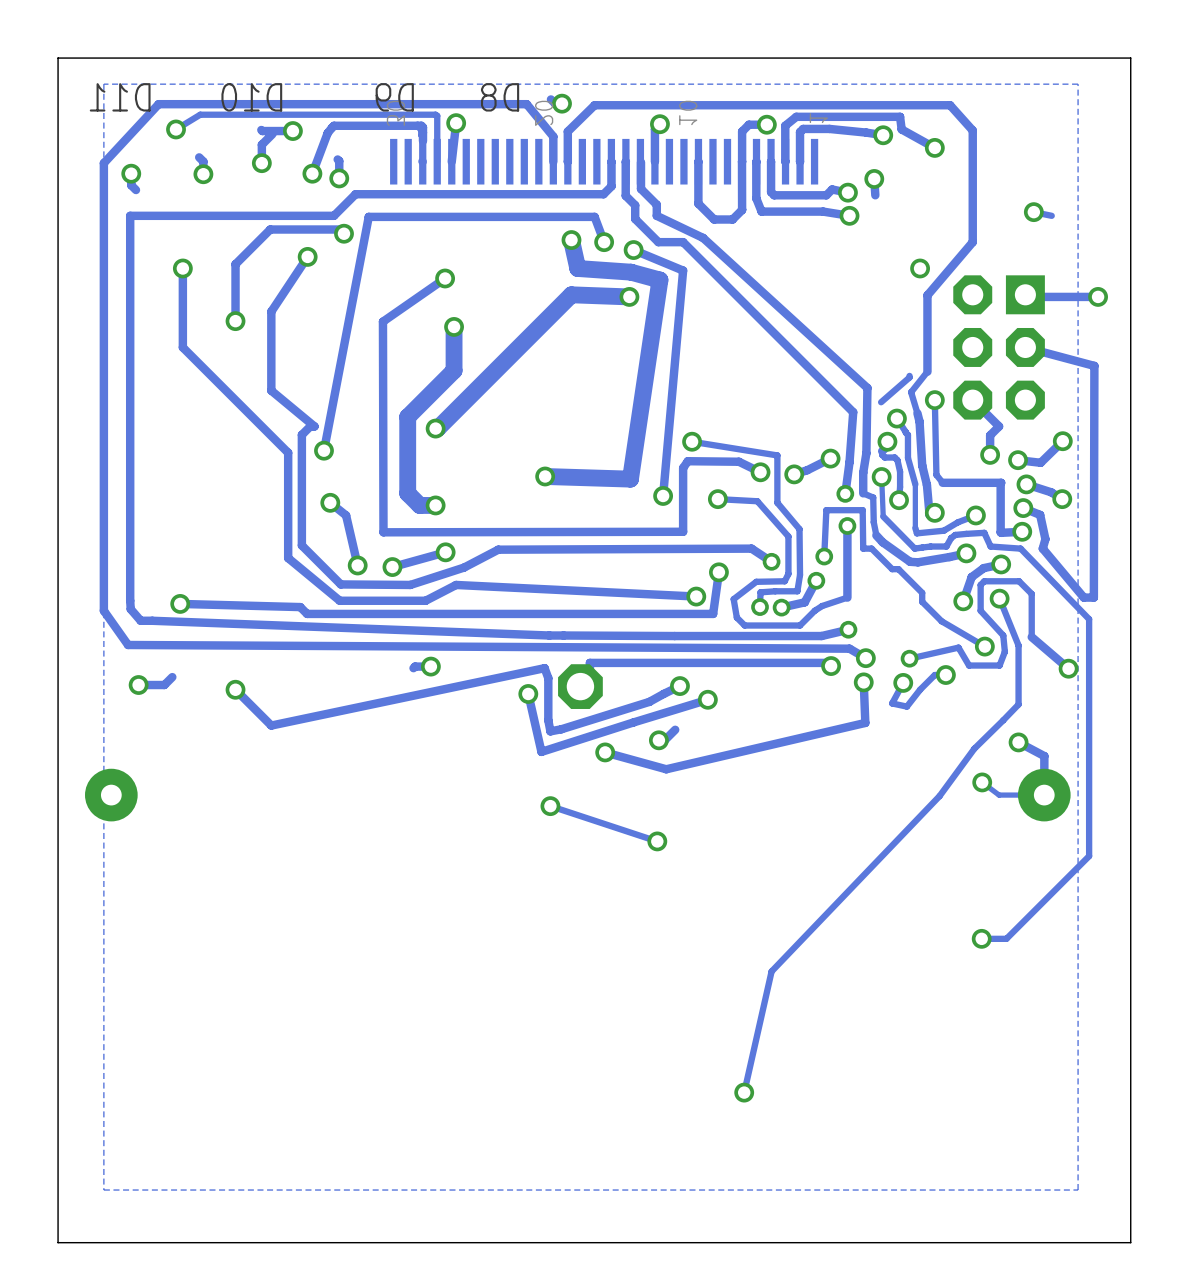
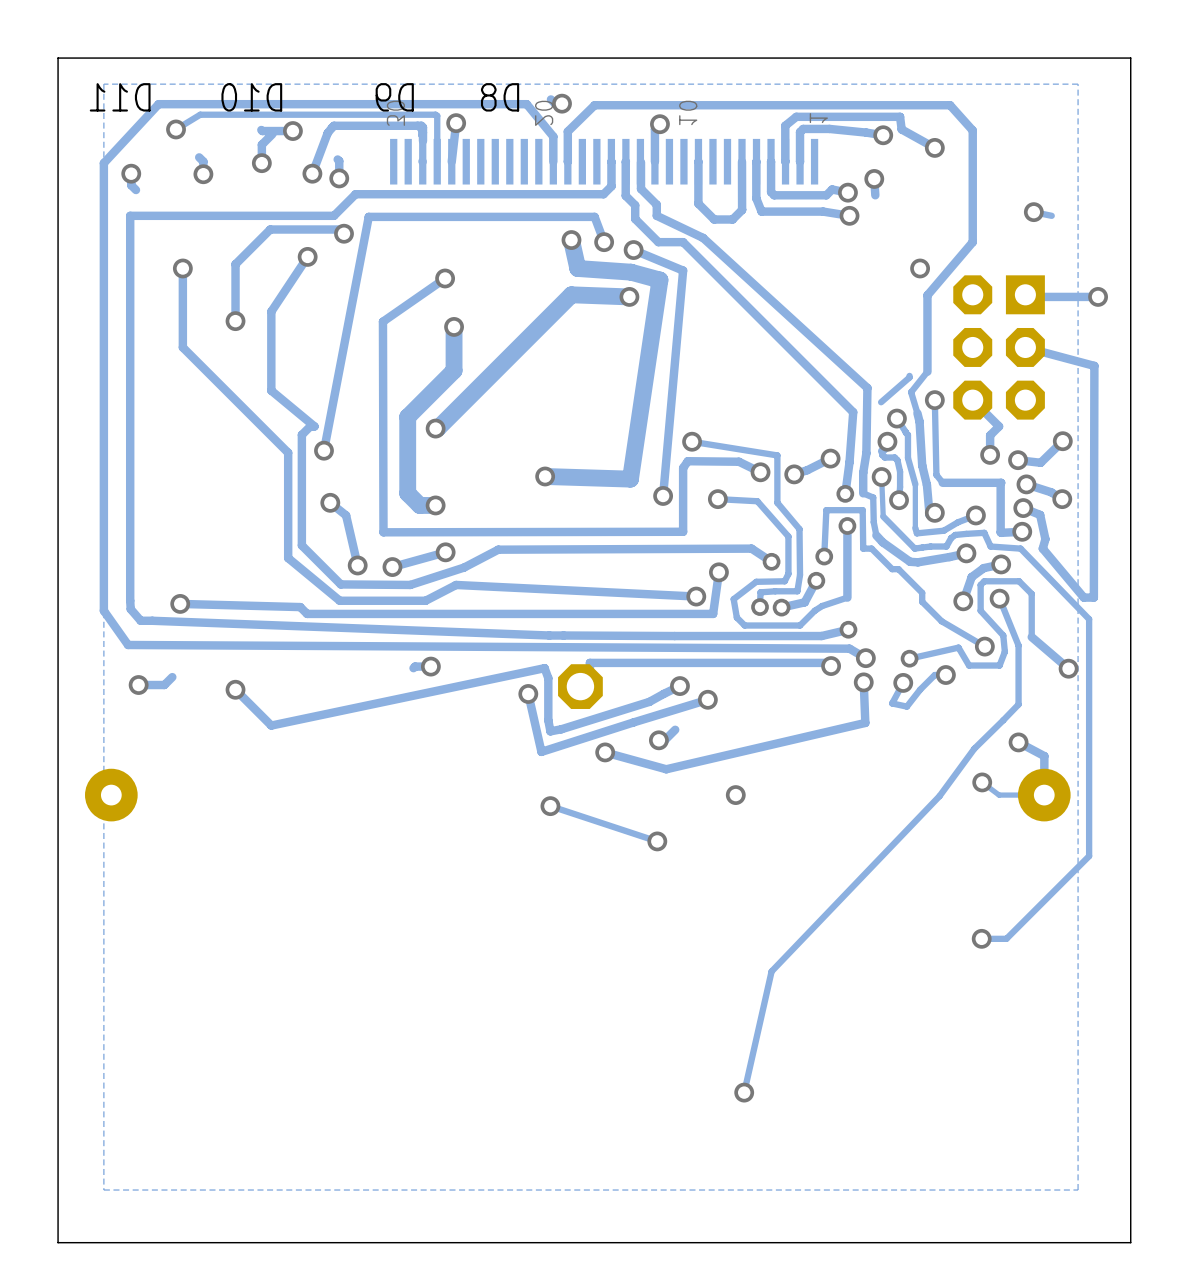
track: (766, 124) (748, 124) (742, 131) (742, 161) -> none
via: (766, 124) -> none
via: none -> (735, 795)

